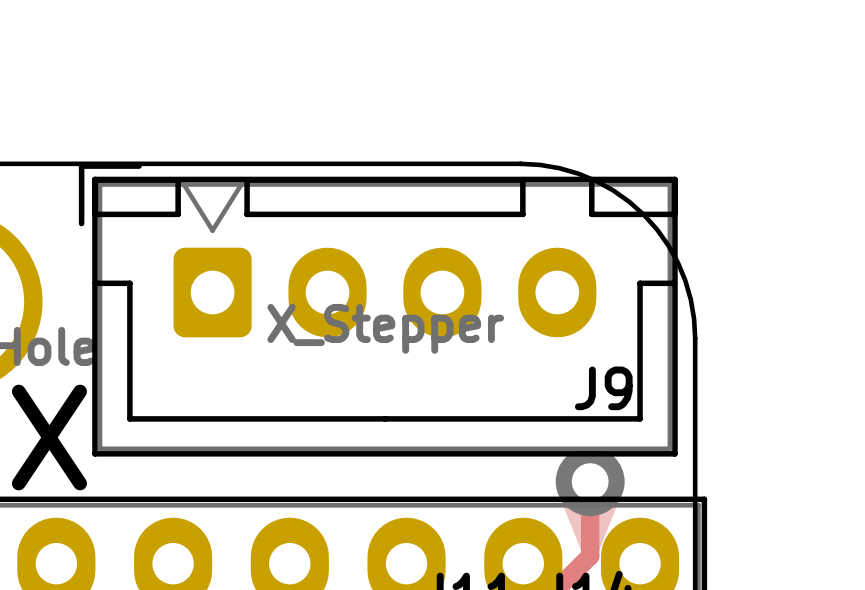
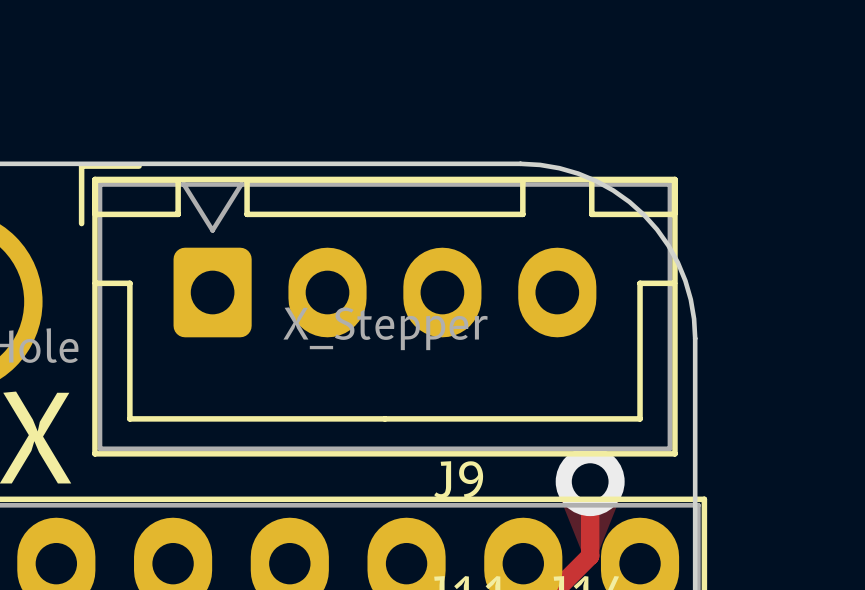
J9 name position: J9 (603, 388) -> J9 (458, 479)

